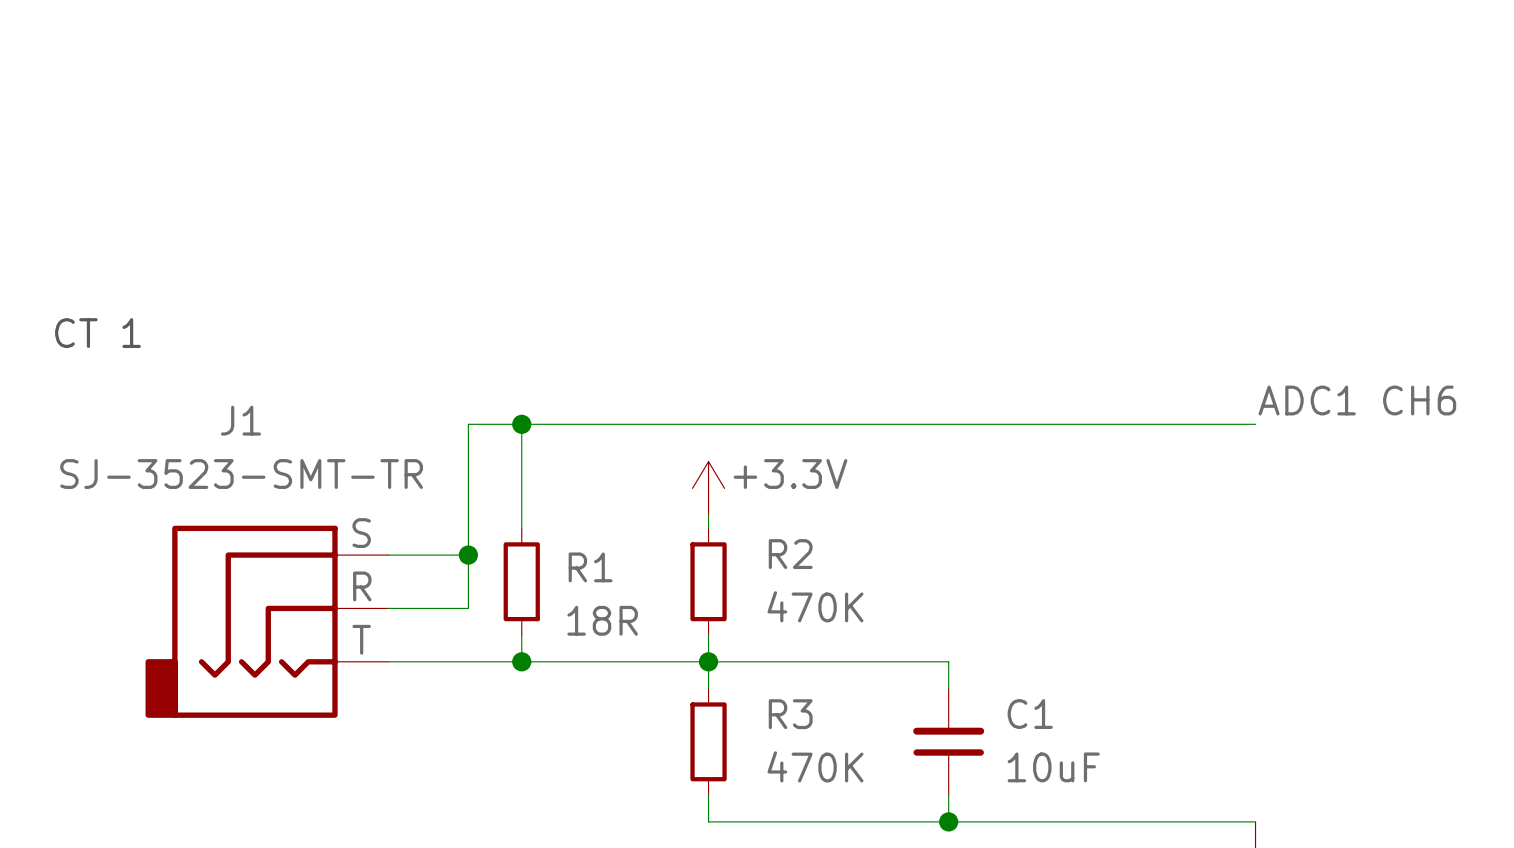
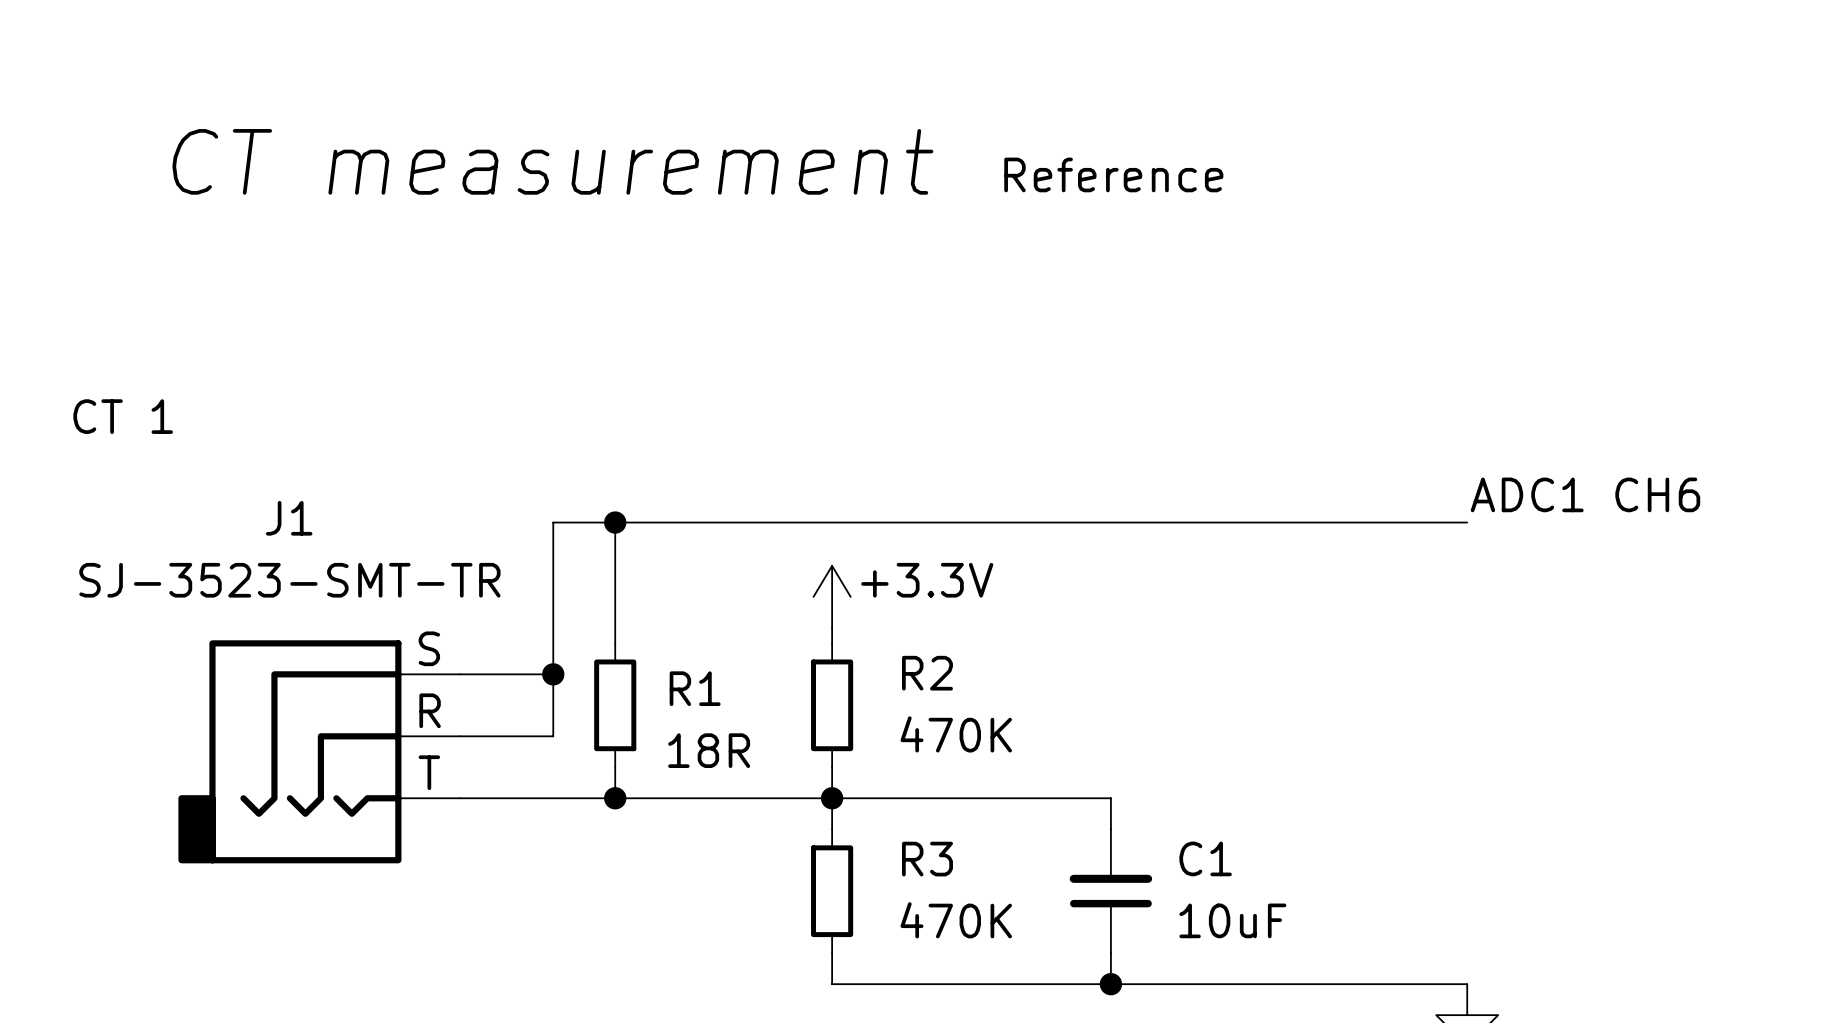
text: none -> CT measurement (552, 161)
text: none -> Reference (1113, 174)

